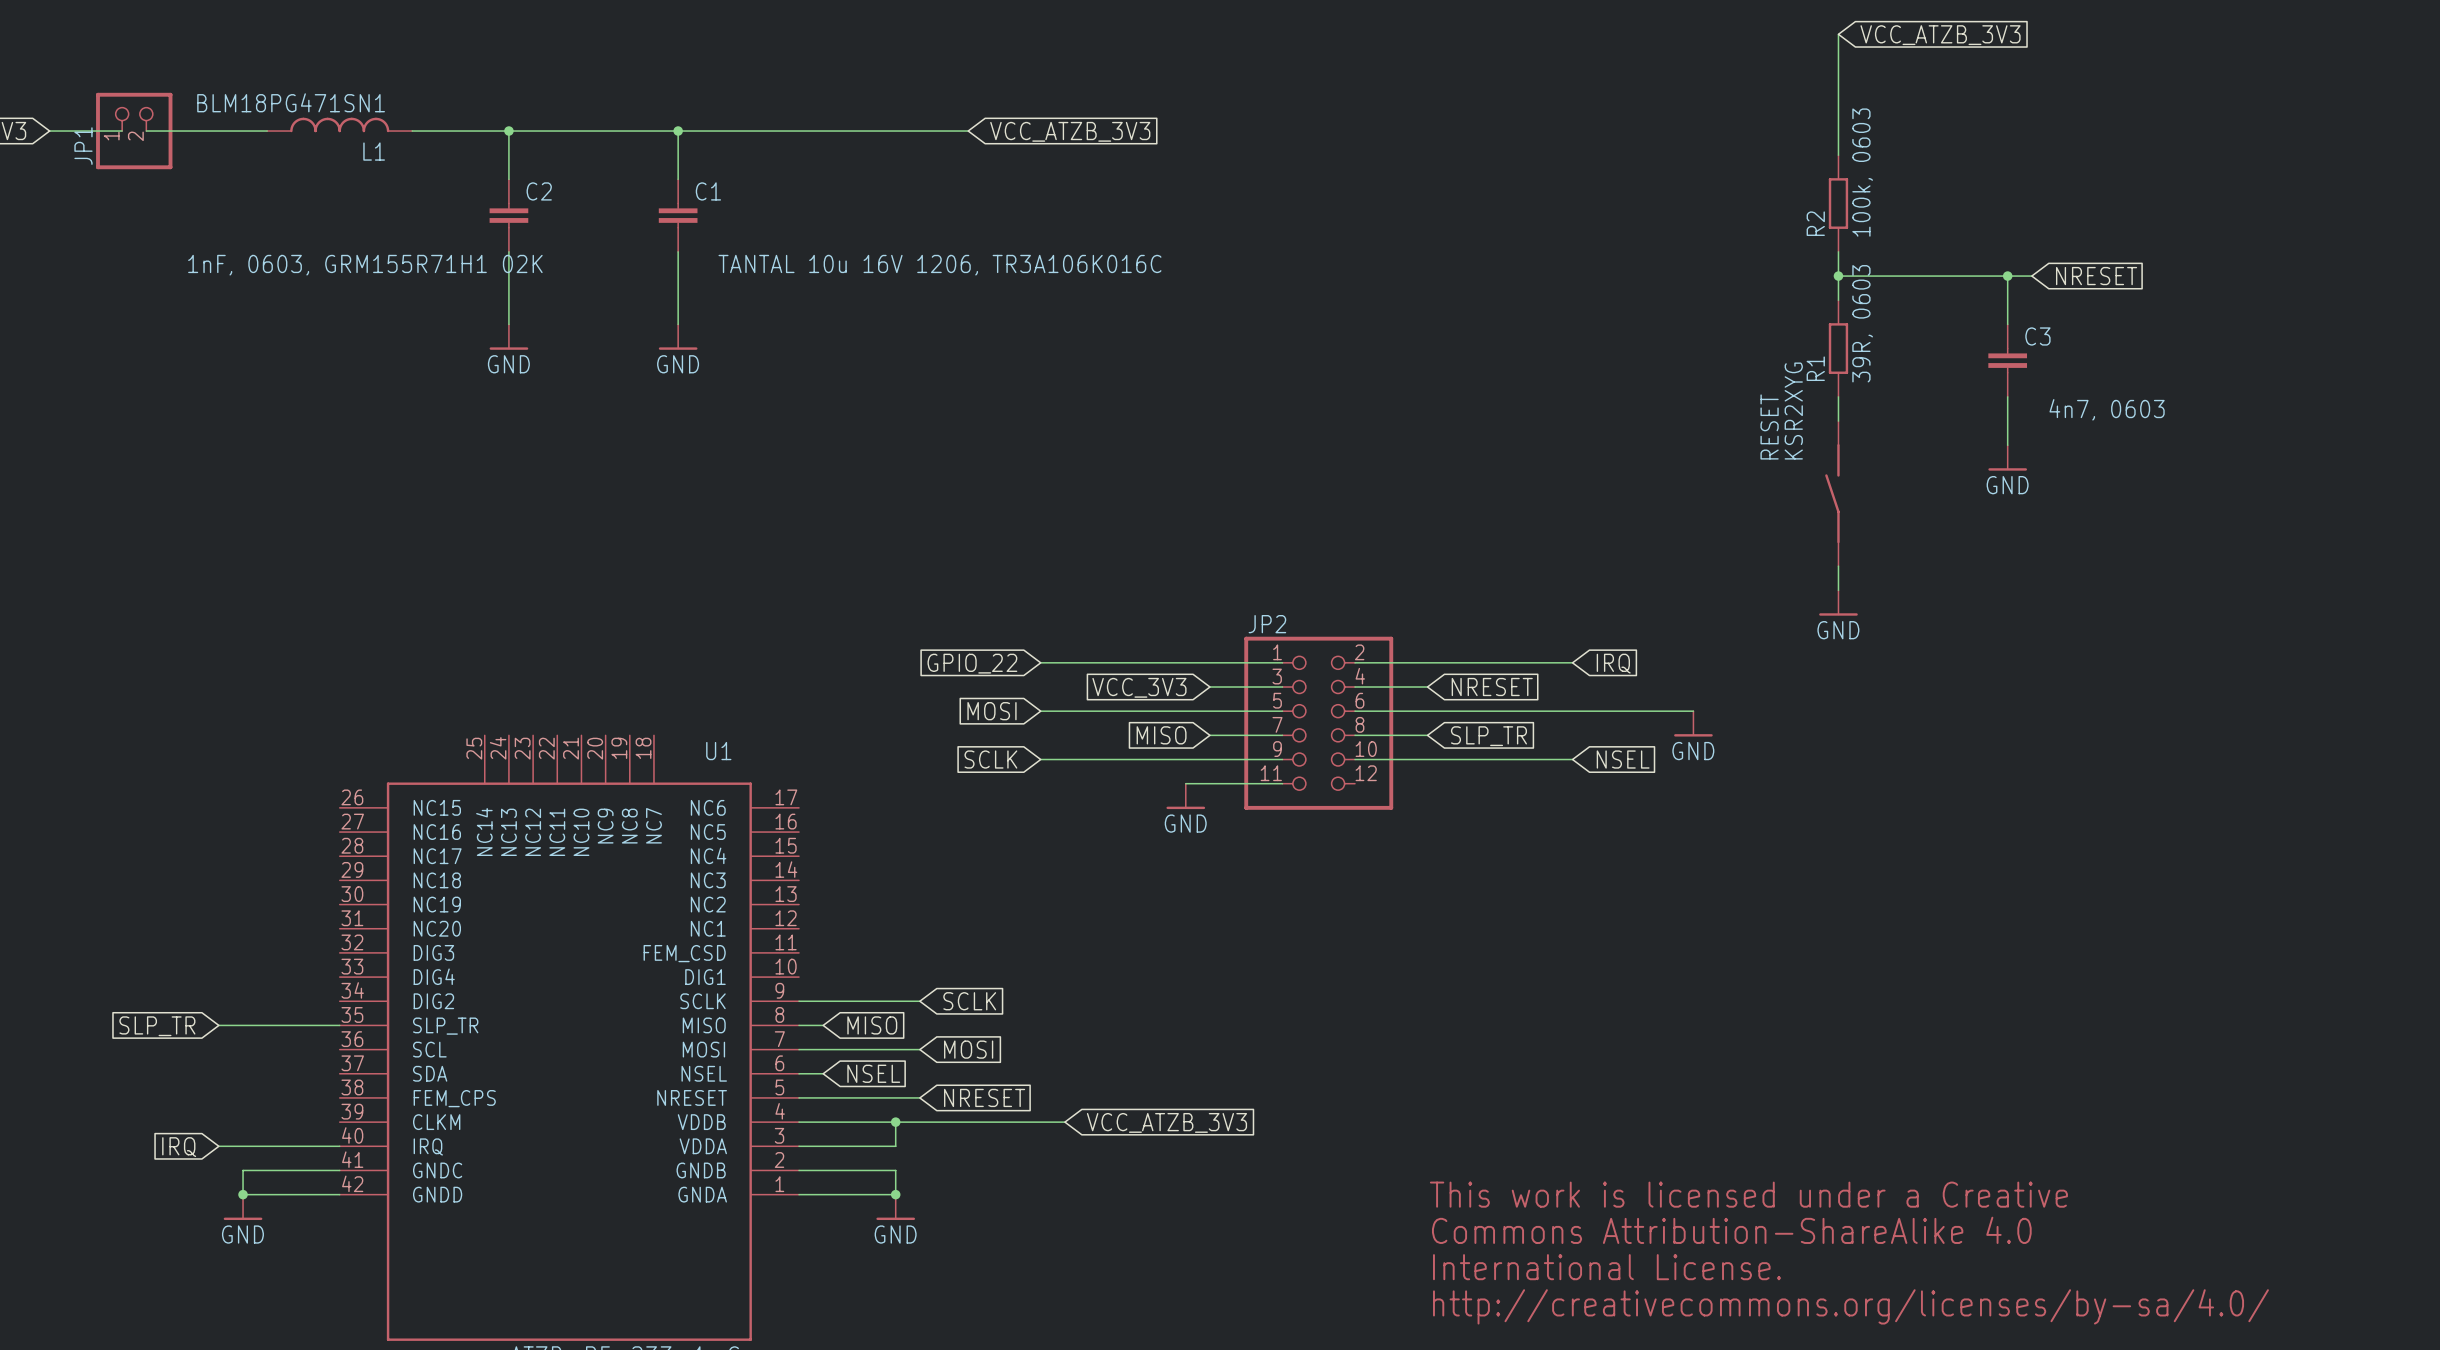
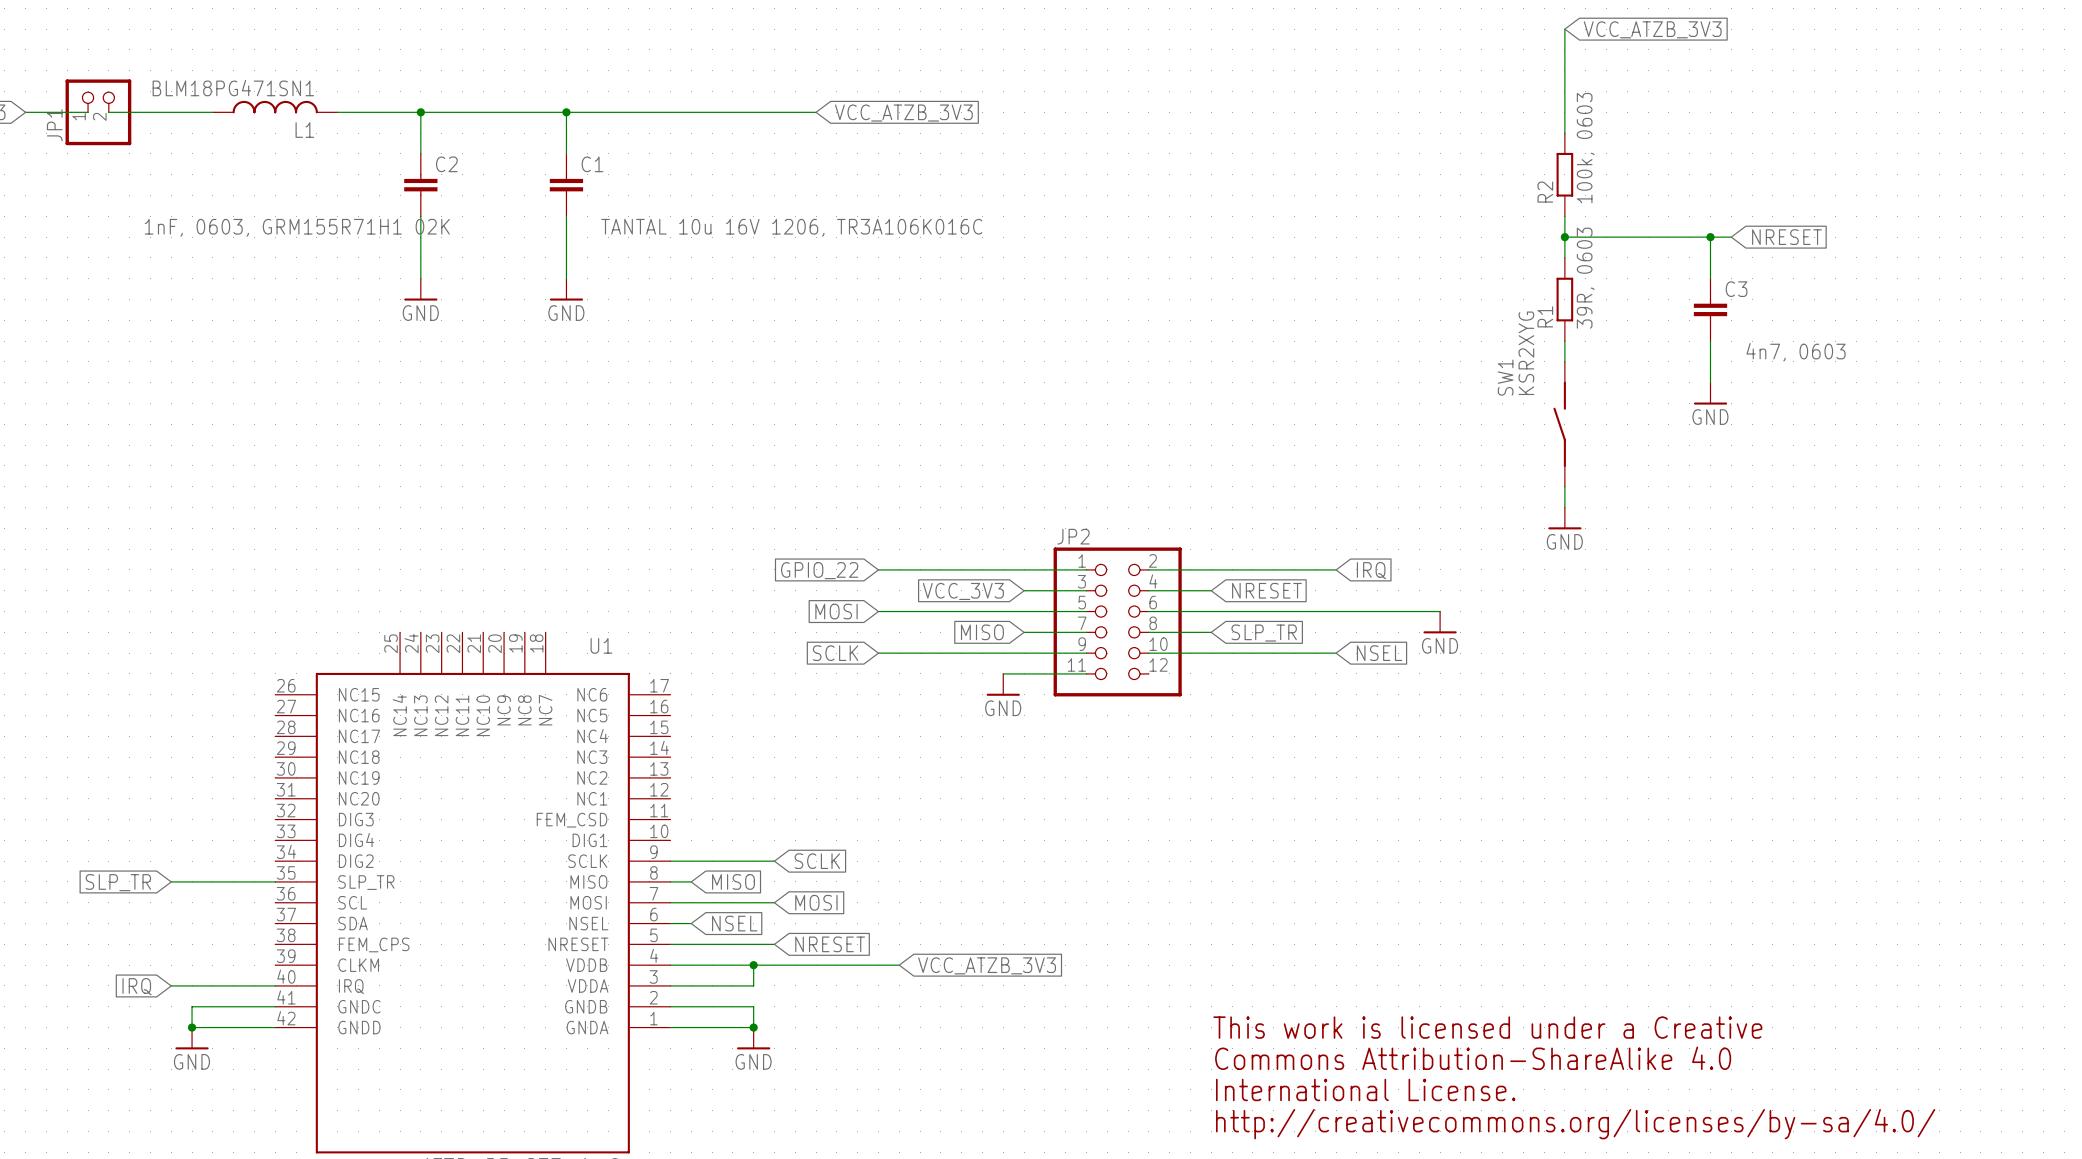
RESET name: RESET (1769, 426) -> SW1 (1505, 377)

